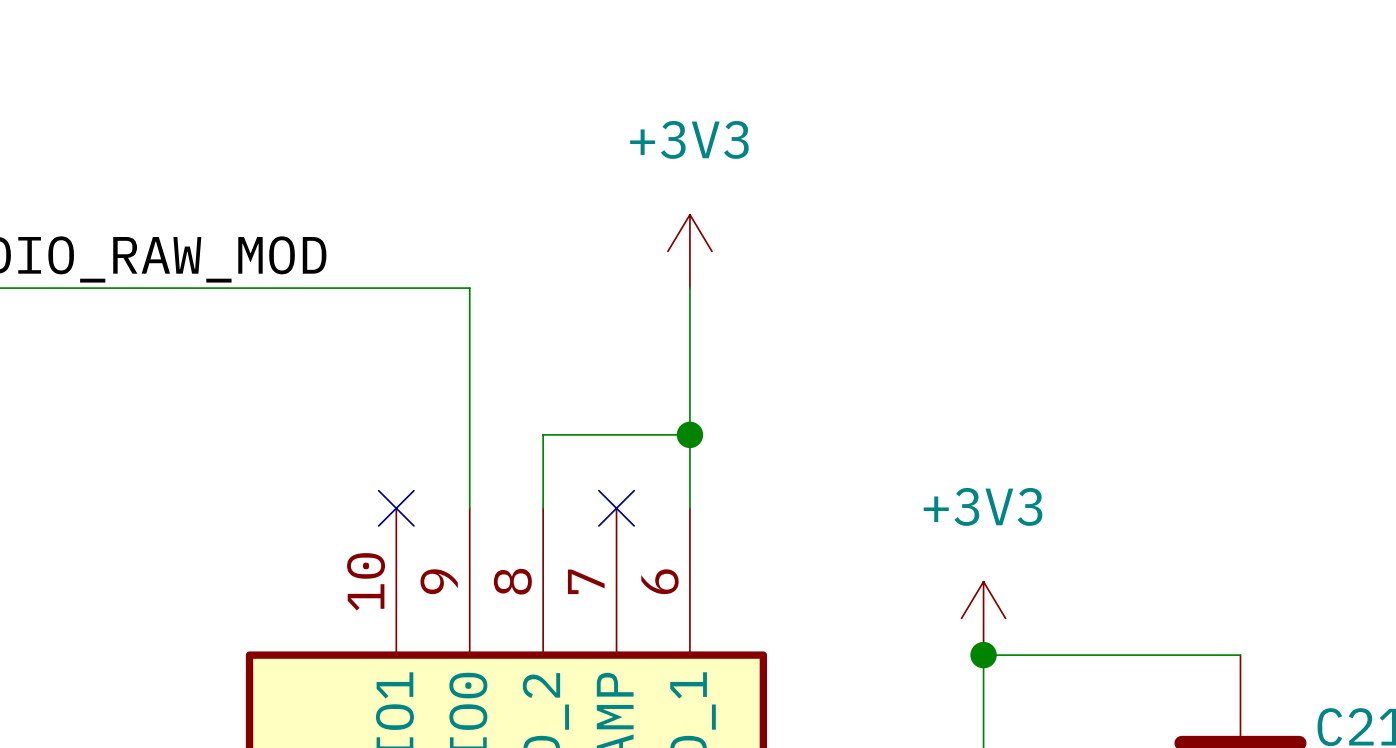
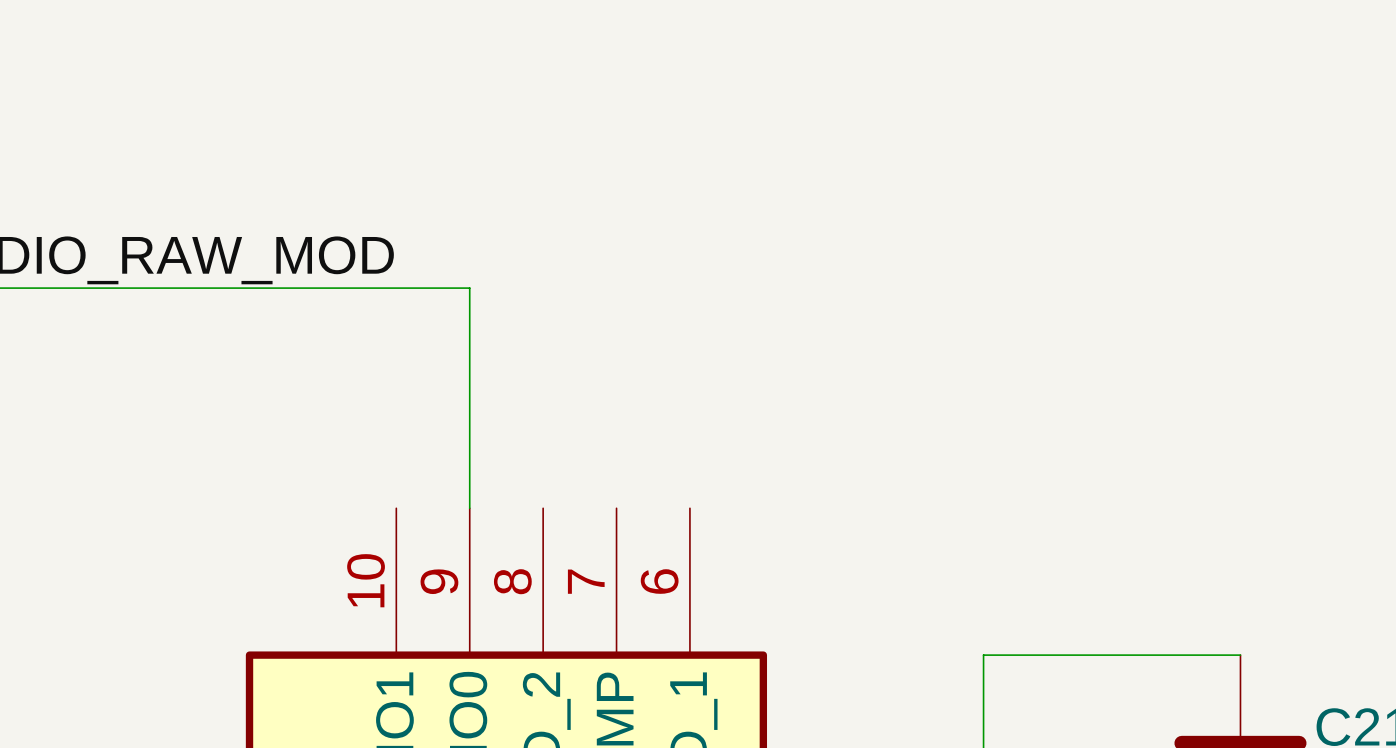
power symbol: +3V3 (689, 251) -> none
wire: (689, 288) (689, 508) -> none
wire: (689, 434) (543, 434) (543, 508) -> none
junction: (689, 434) -> none
no-connect mark: (396, 508) -> none
no-connect mark: (616, 508) -> none
power symbol: +3V3 (983, 618) -> none
junction: (983, 655) -> none

